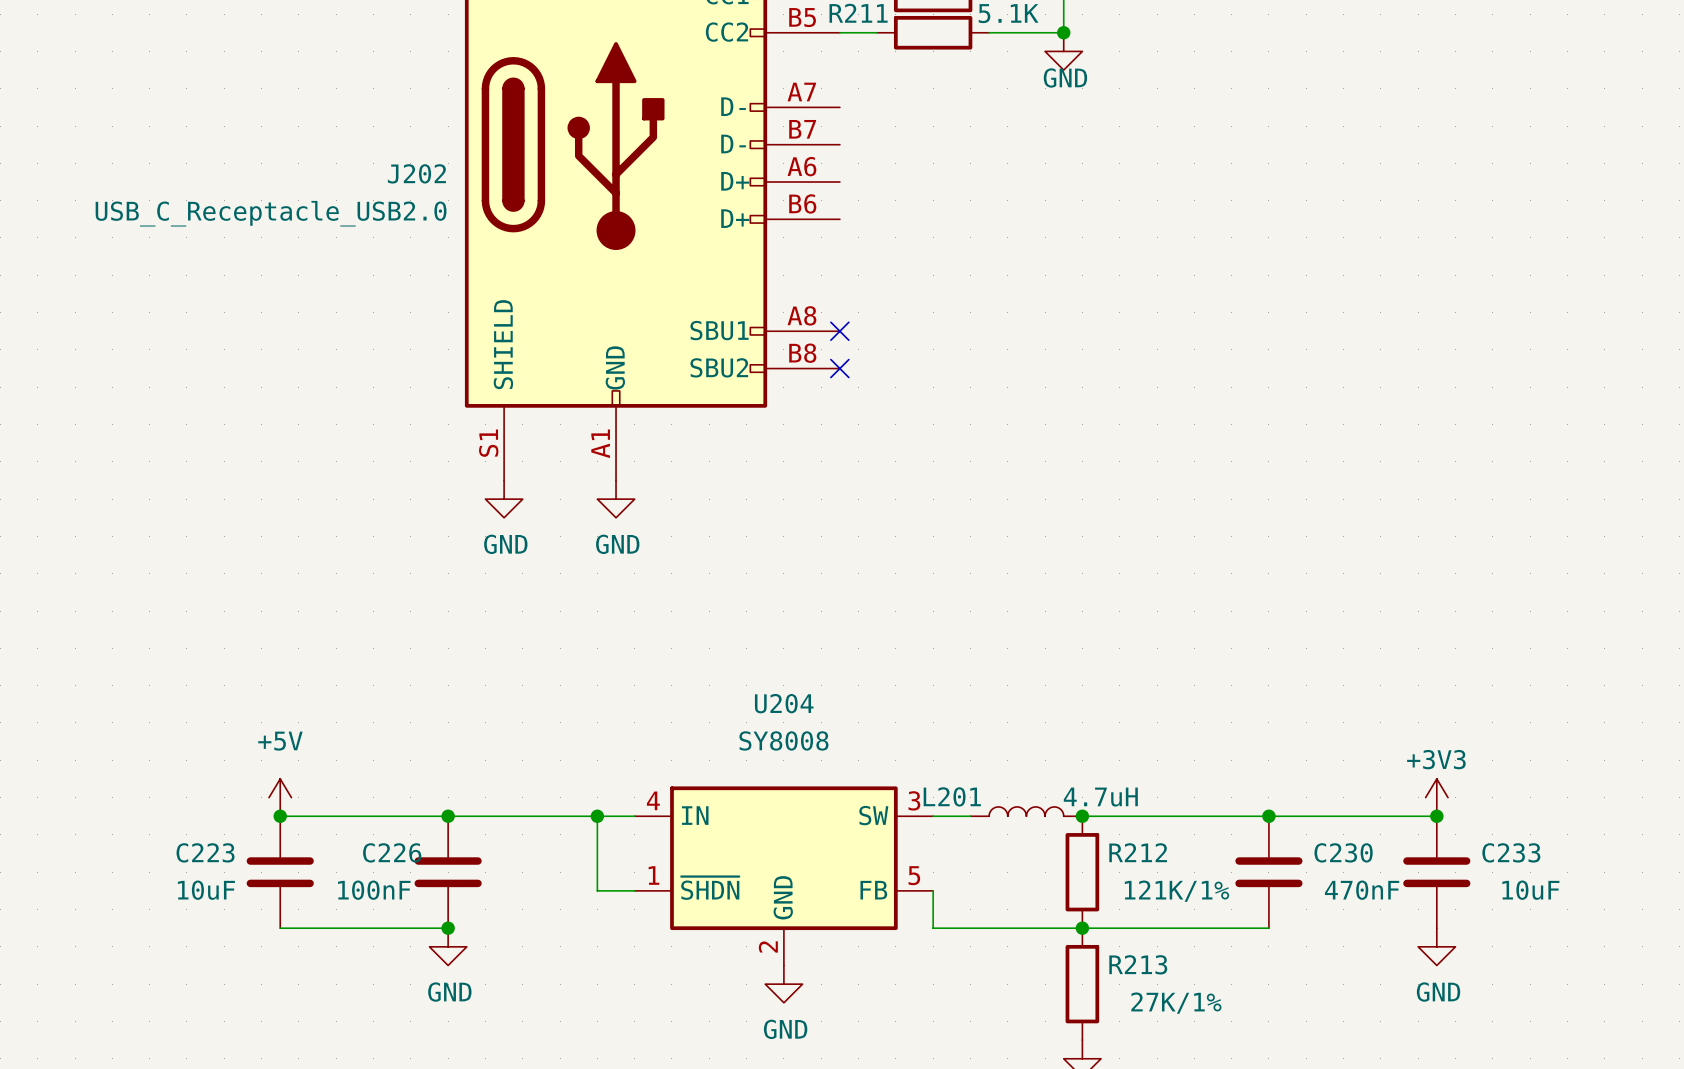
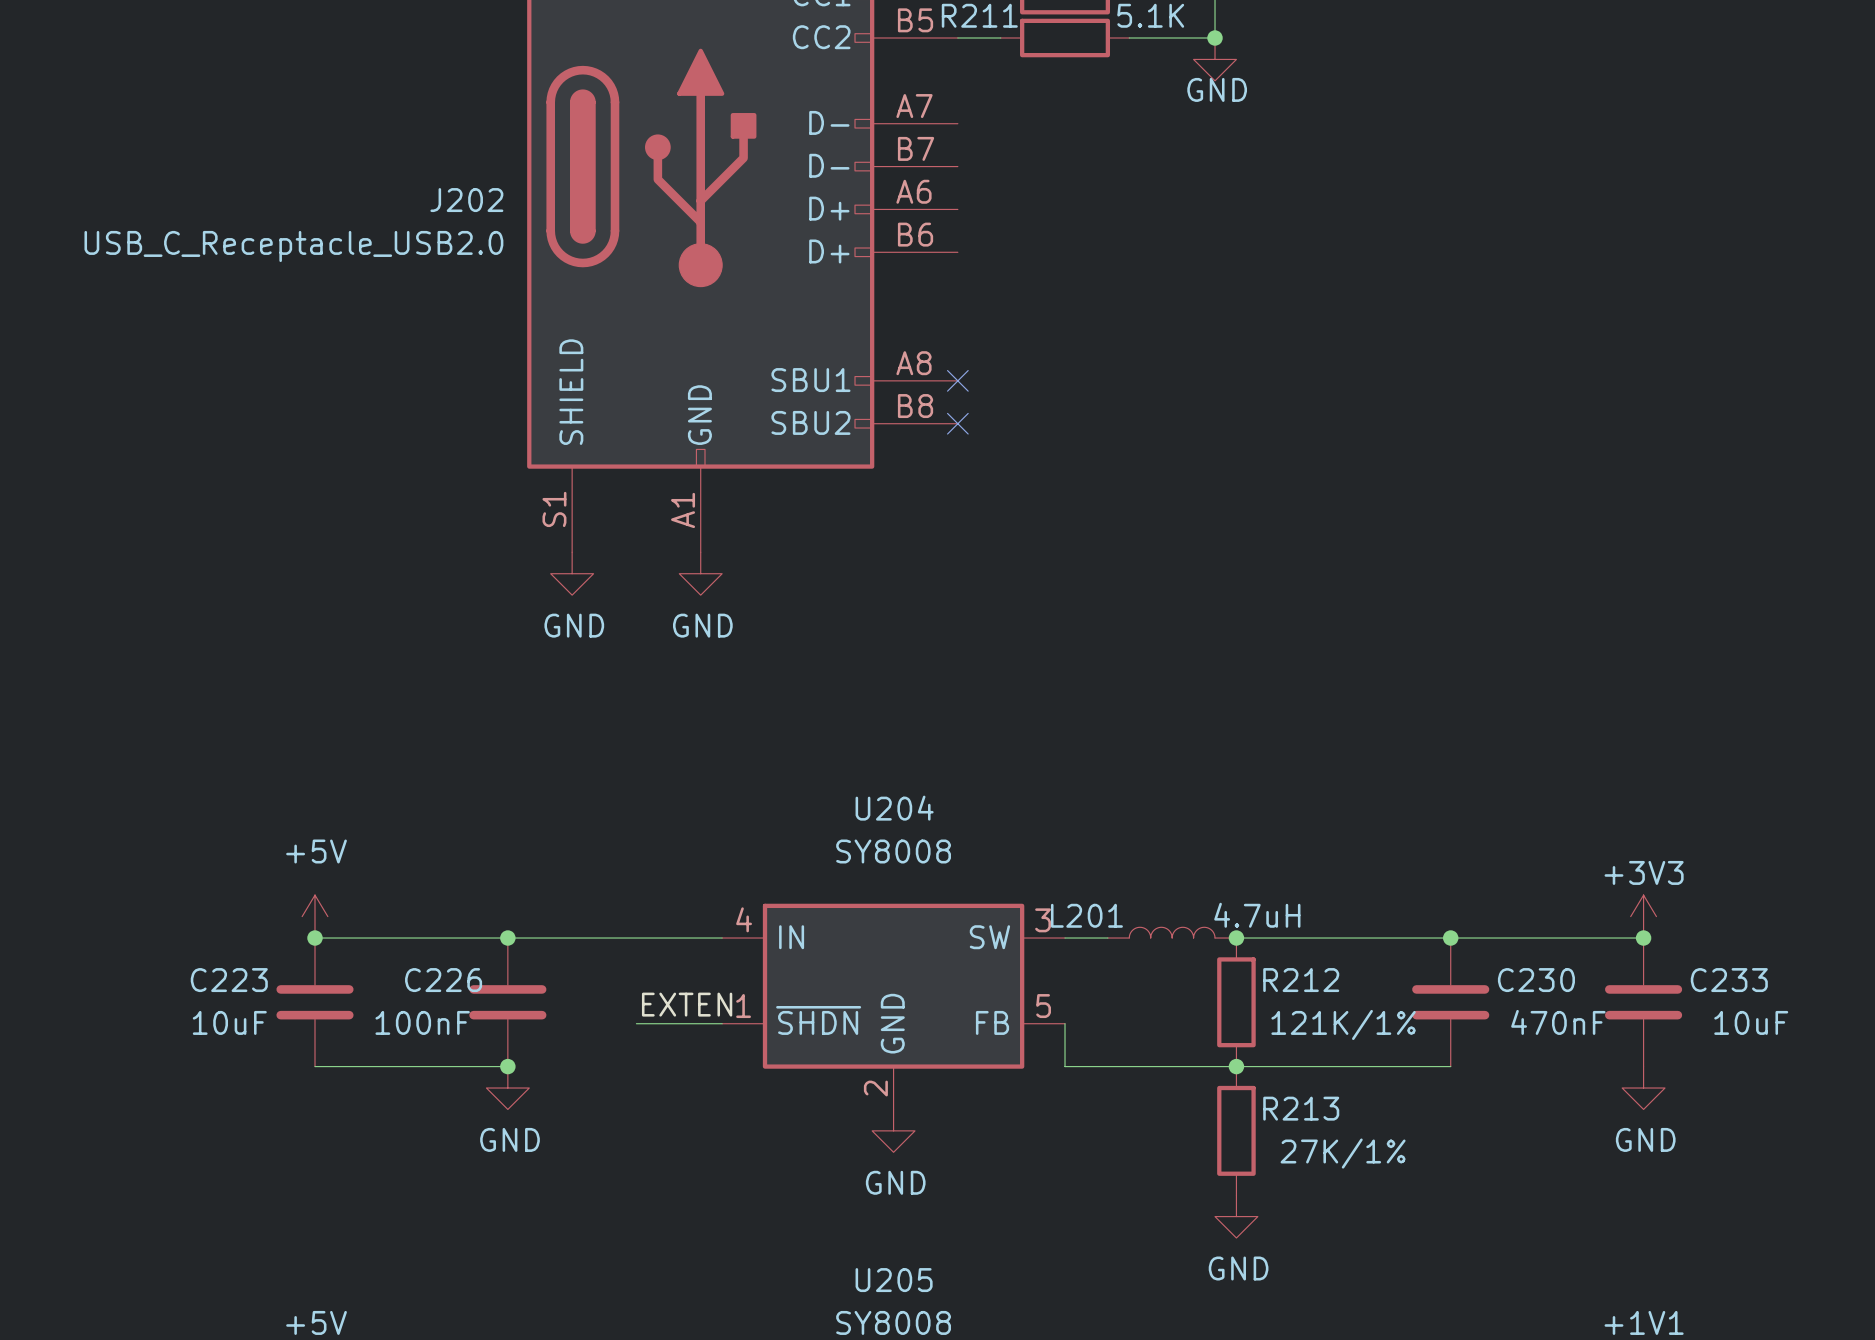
wire: (597, 816) (597, 890) -> (636, 1023) (679, 1023)
junction: (597, 816) -> none
label: none -> EXTEN (687, 1004)

